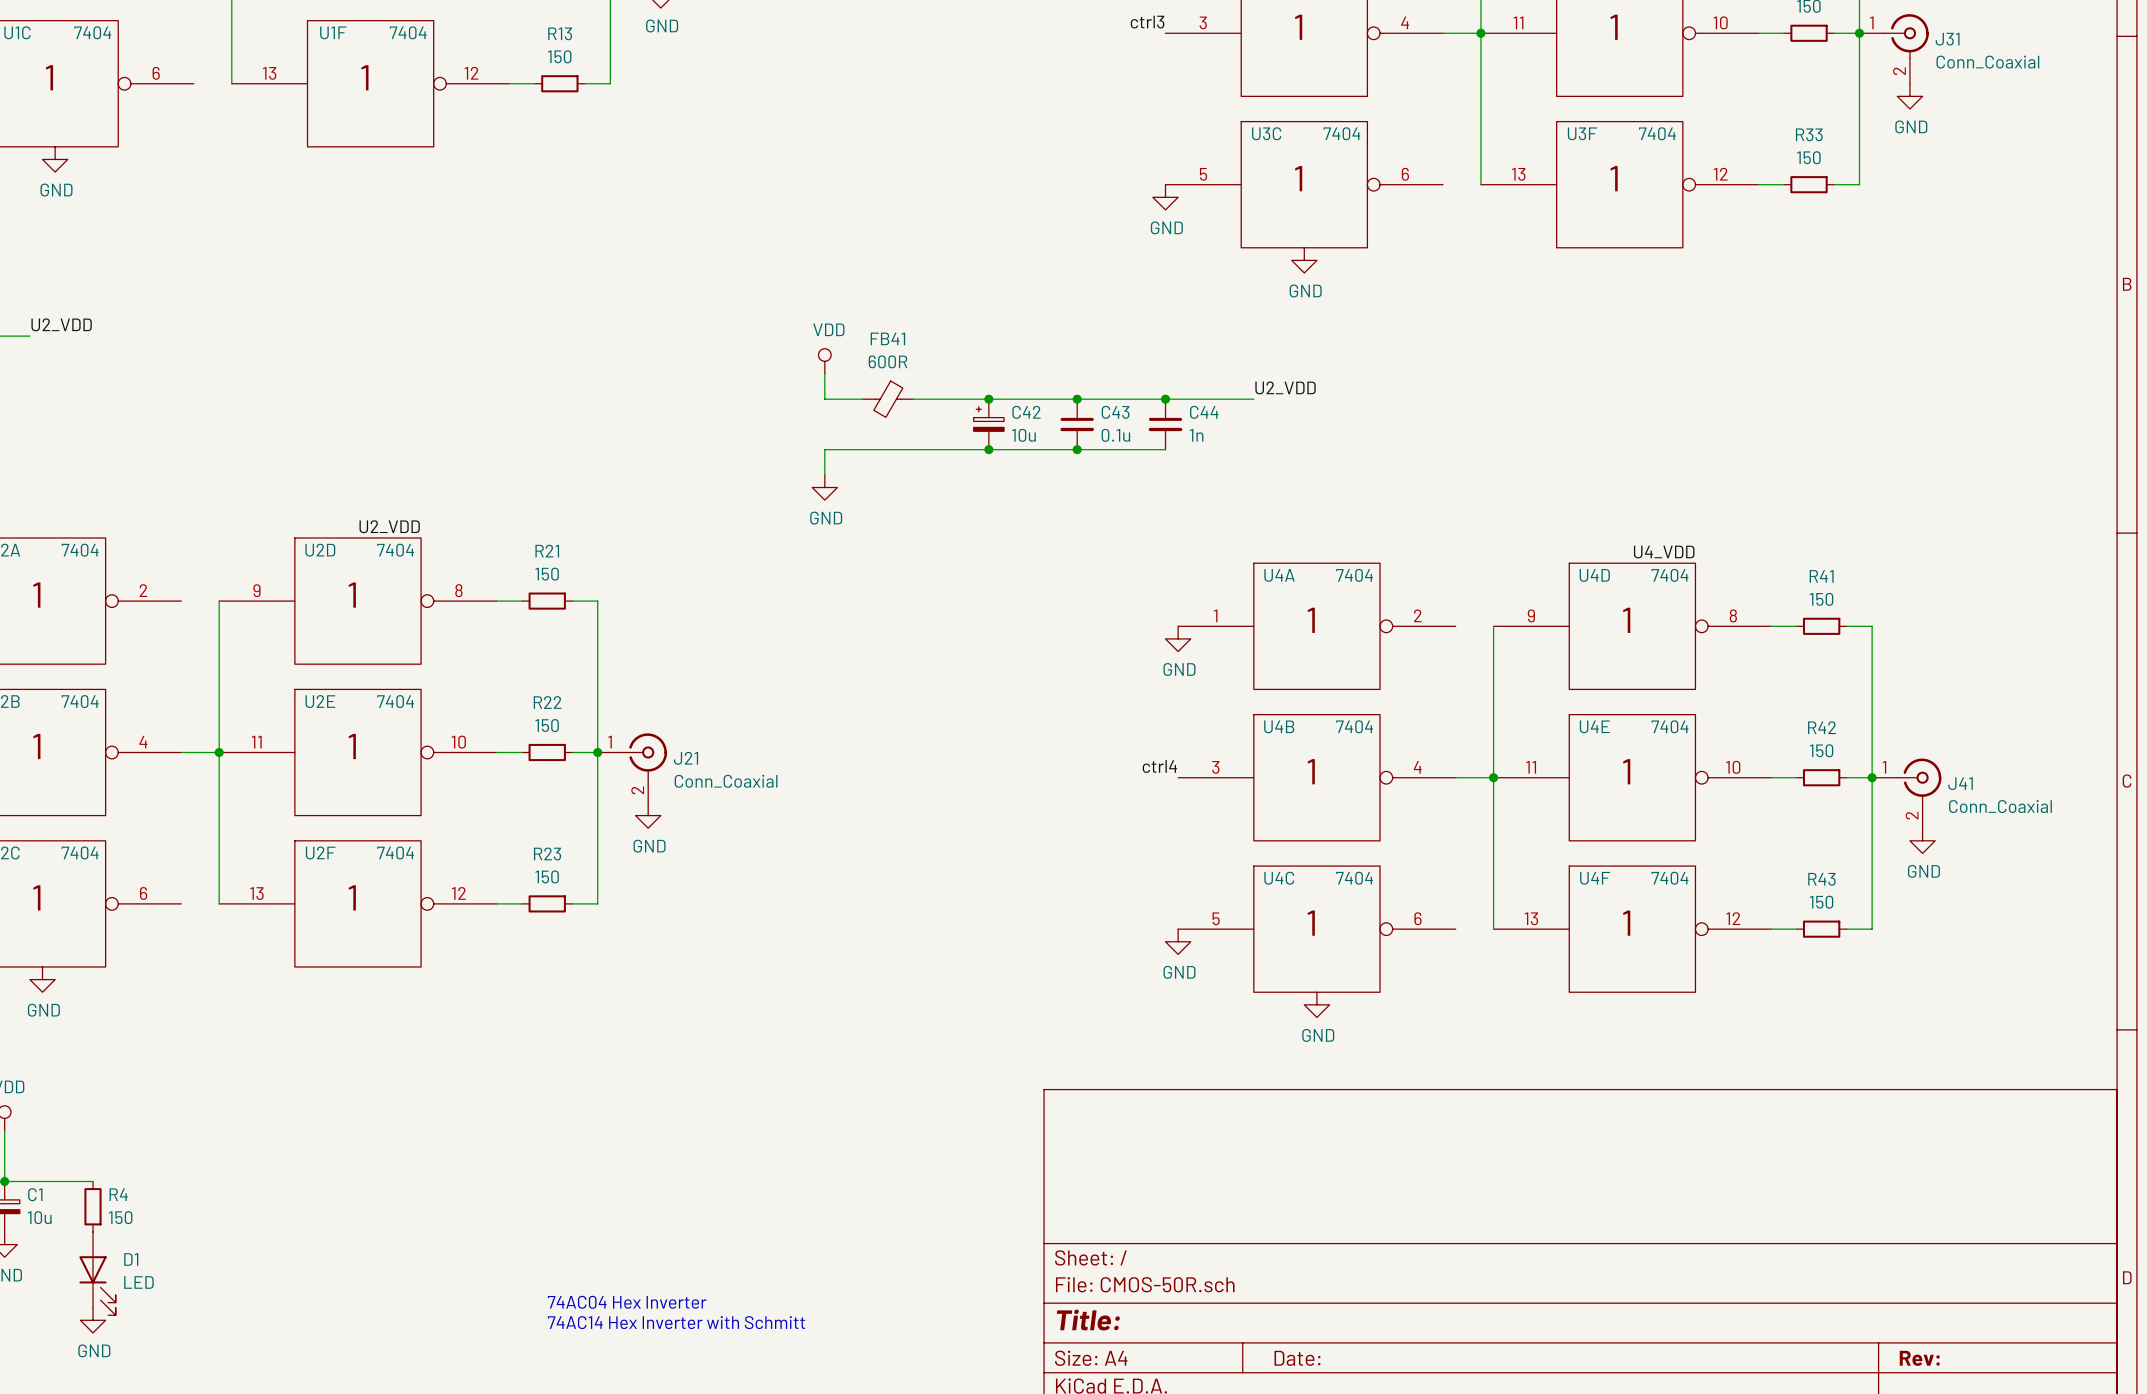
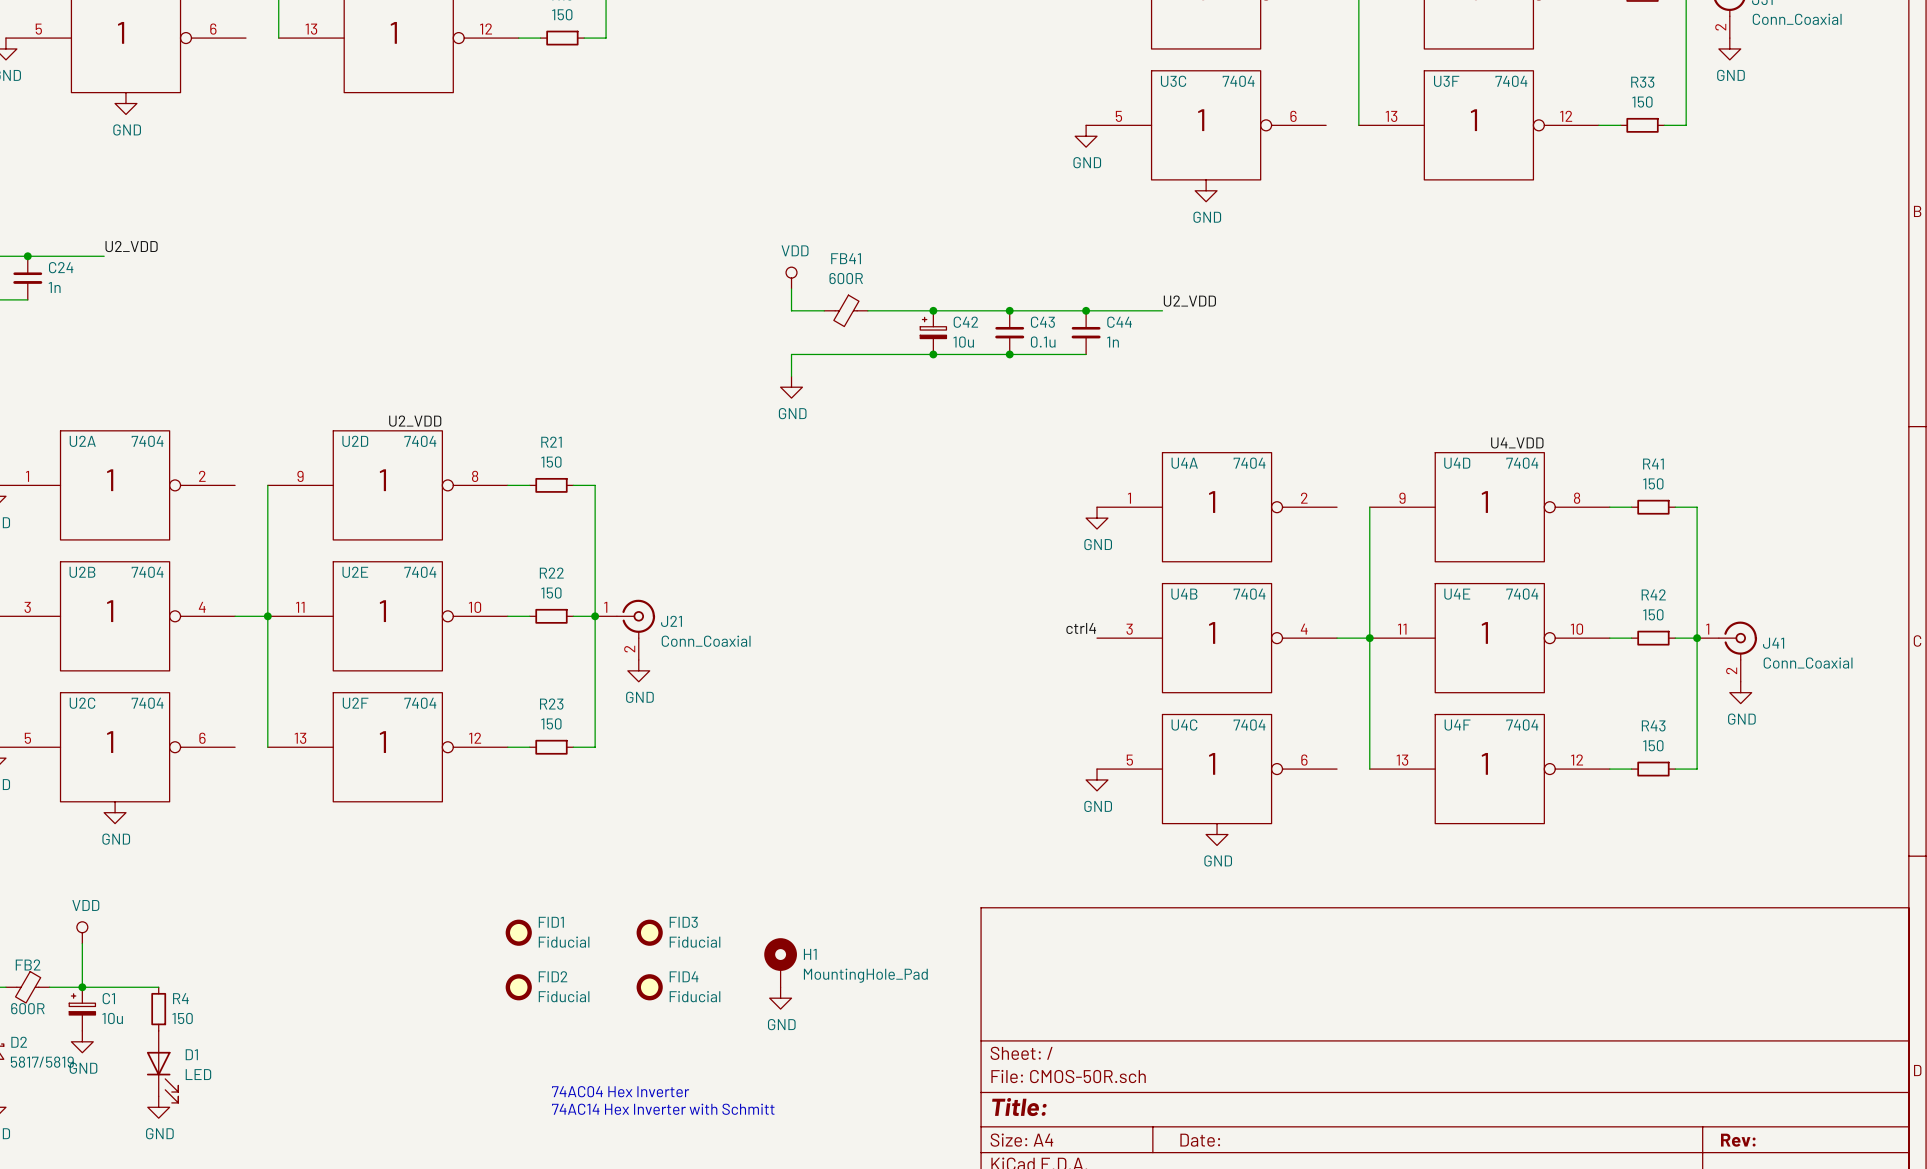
FID1: none -> Fiducial (518, 932)
FID3: none -> Fiducial (649, 932)
H1: none -> MountingHole_Pad (780, 962)
FID2: none -> Fiducial (518, 987)
FID4: none -> Fiducial (649, 987)
power symbol: none -> GND (780, 998)

